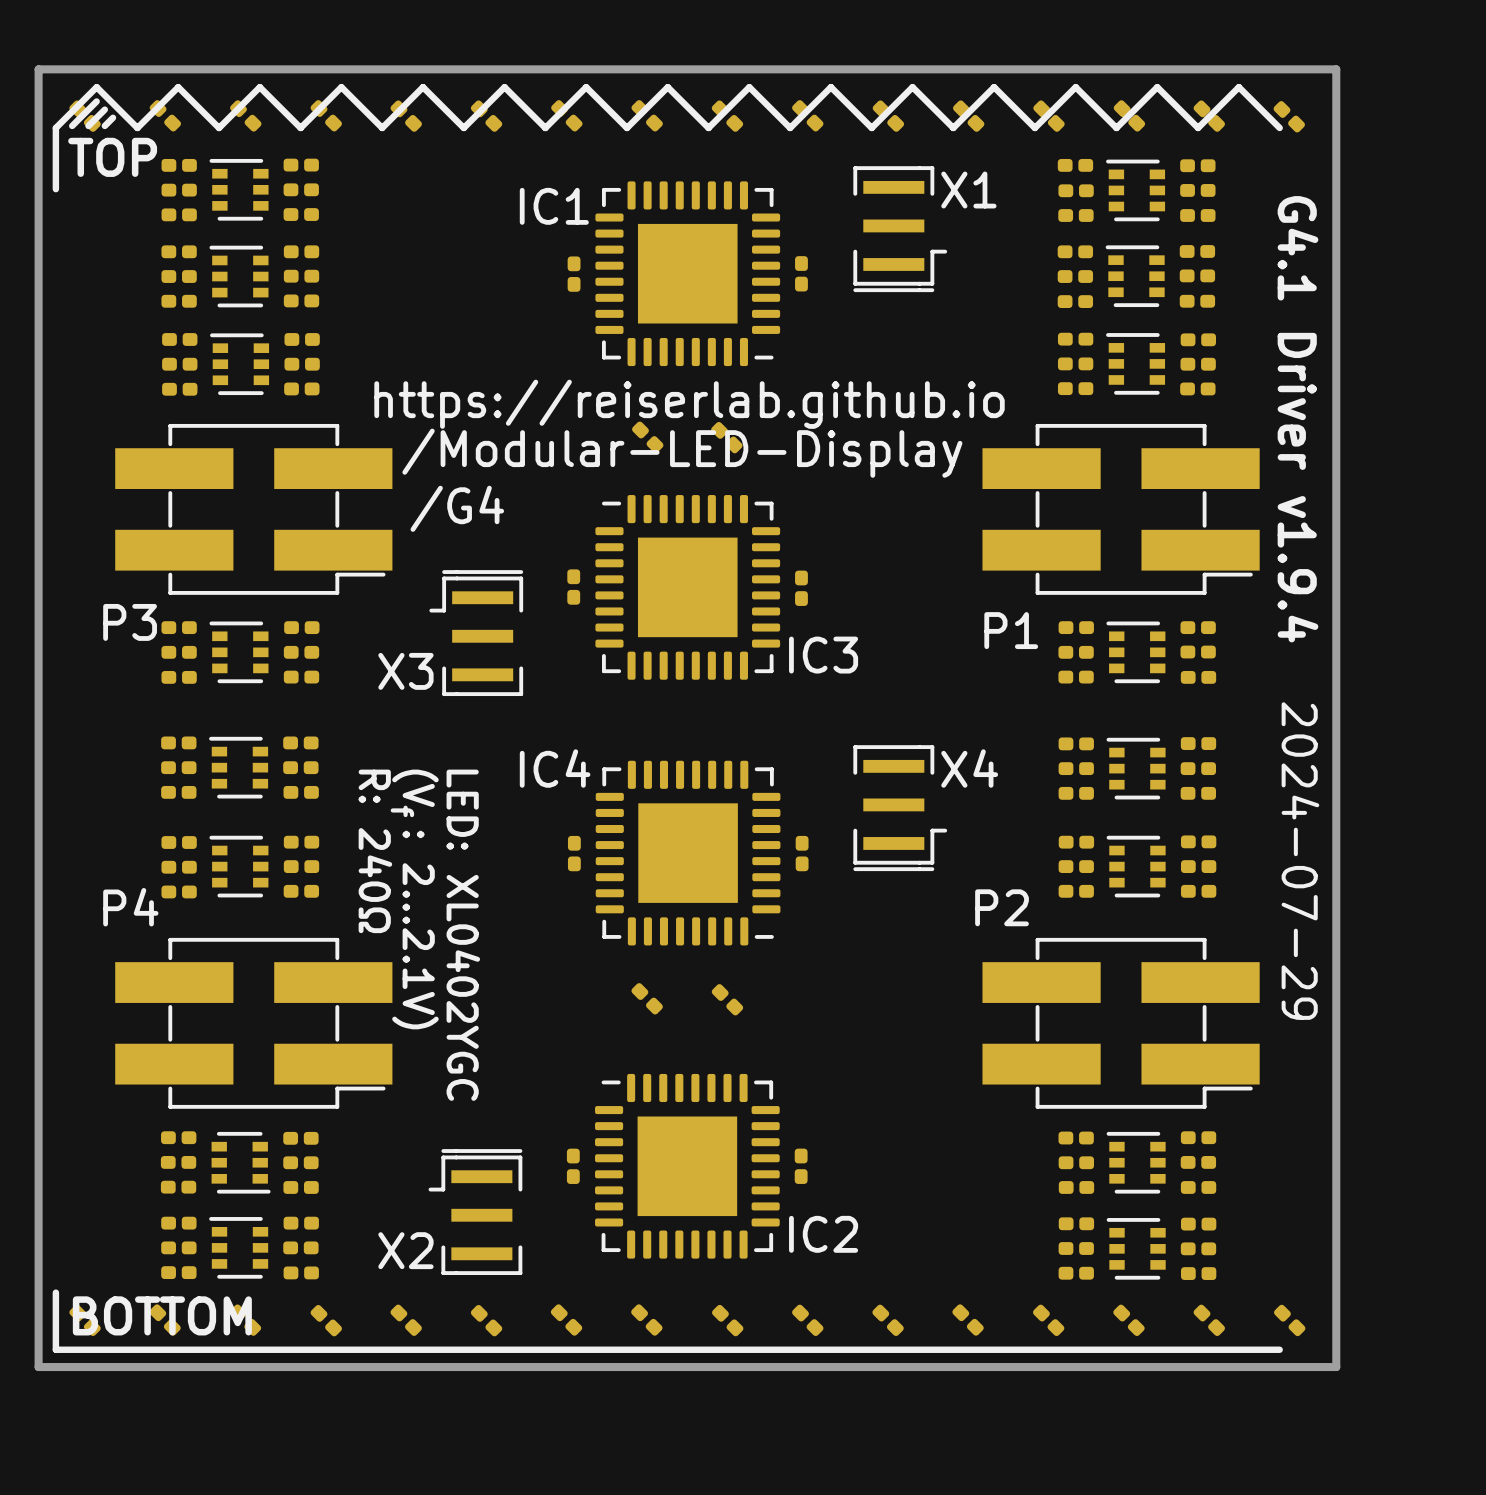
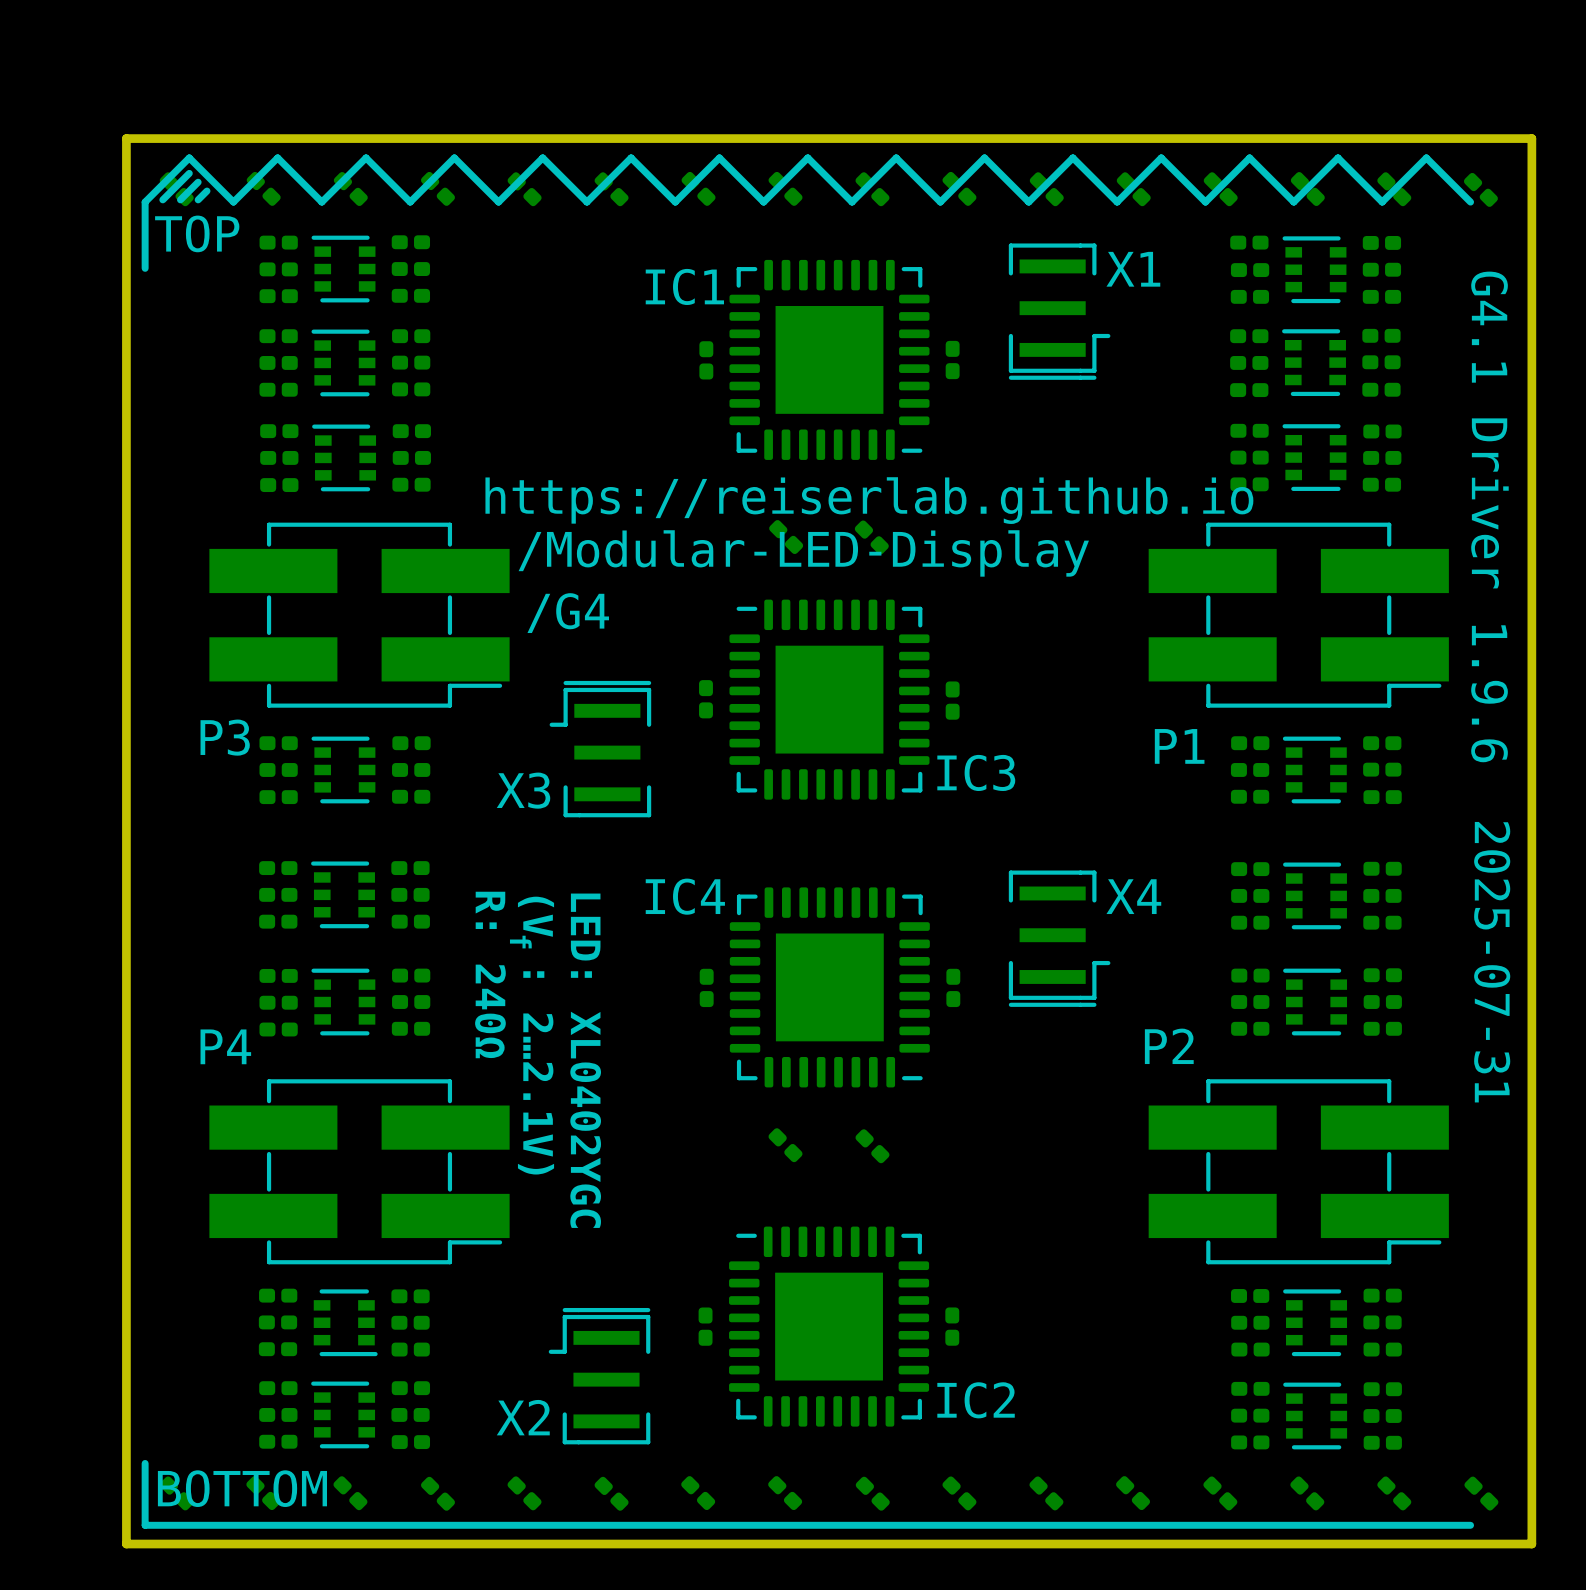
text: G4.1 Driver v1.9.4 (1298, 419) -> G4.1 Driver 1.9.6 (1489, 516)
text: 2024-07-29 (1300, 861) -> 2025-07-31 (1492, 962)

